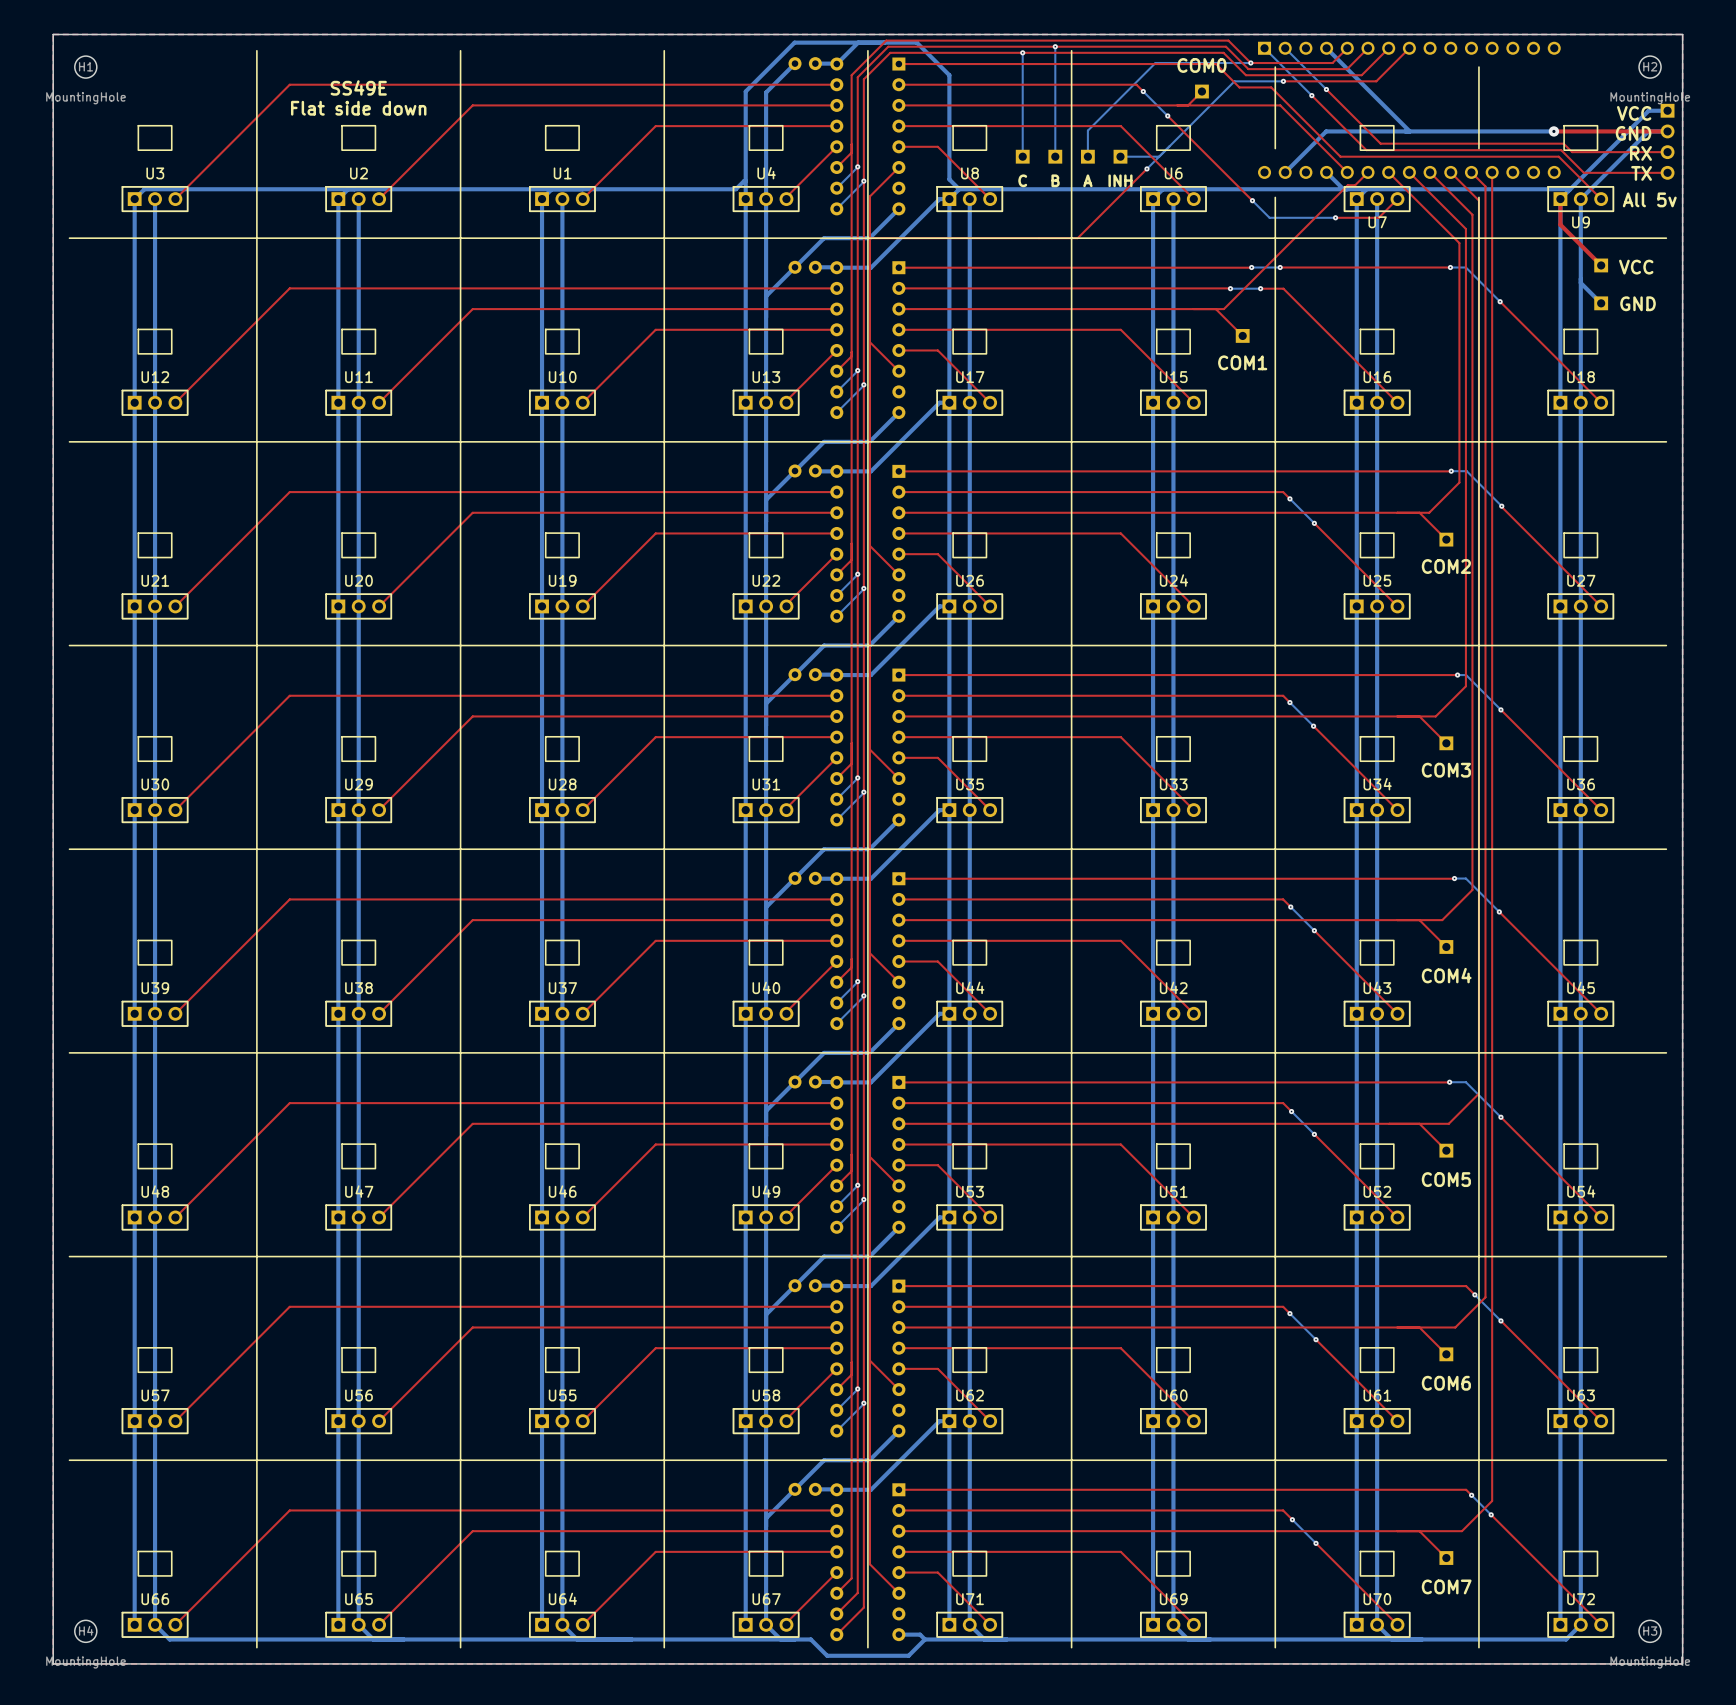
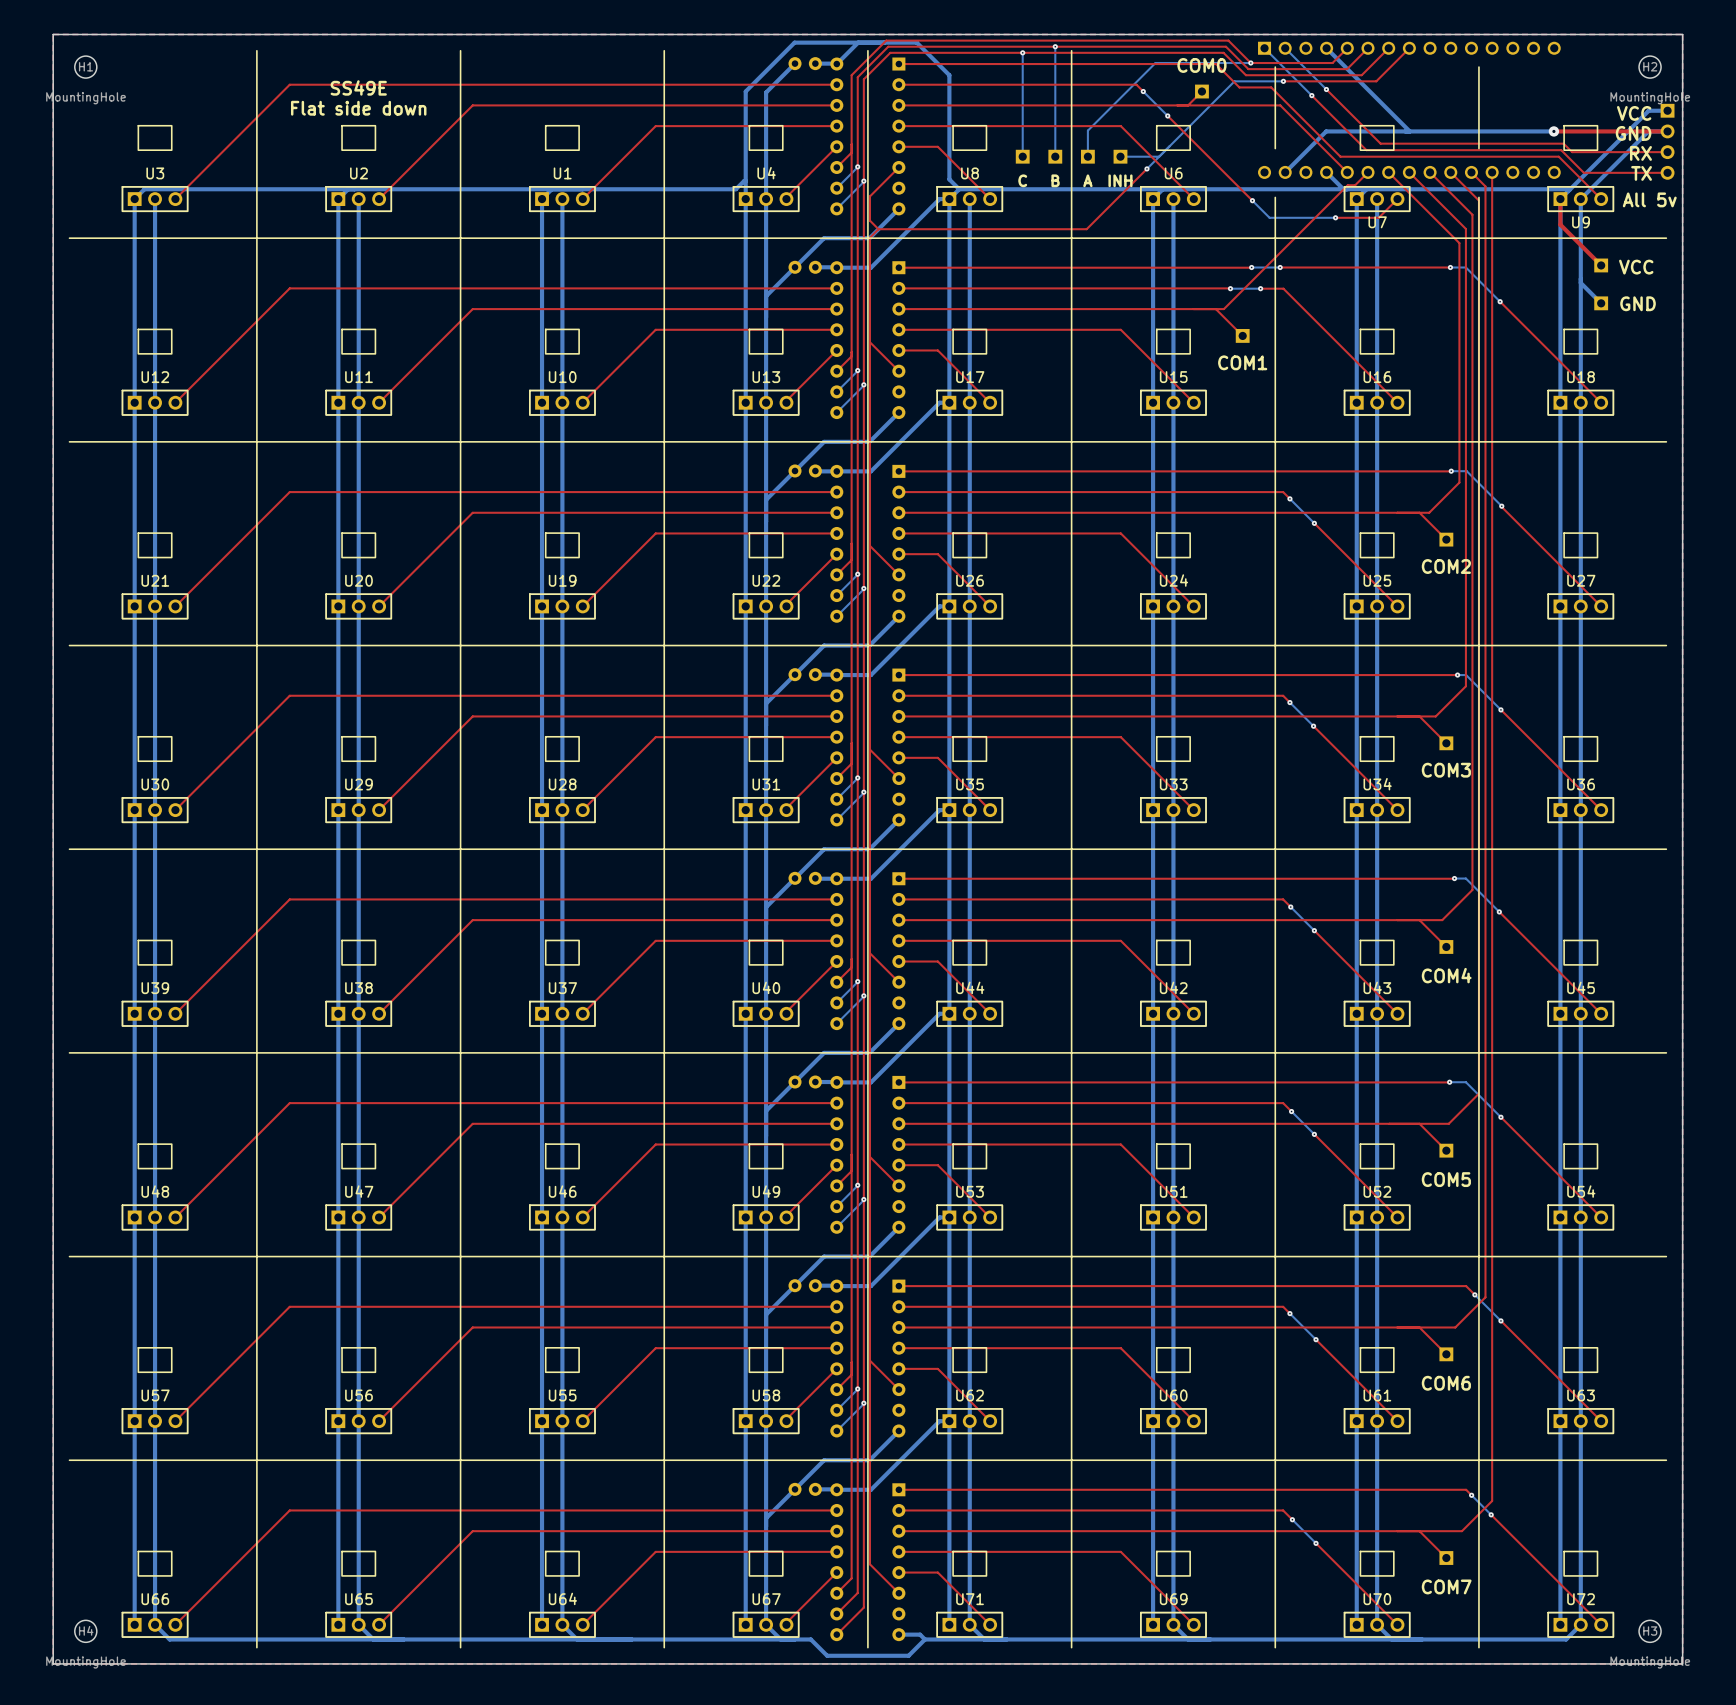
top track: (869, 220) (869, 237) -> (869, 220) (878, 229)
top track: none -> (878, 229) (869, 237)
top track: (1086, 229) (1077, 238) (869, 238) -> (1086, 229) (878, 229)

